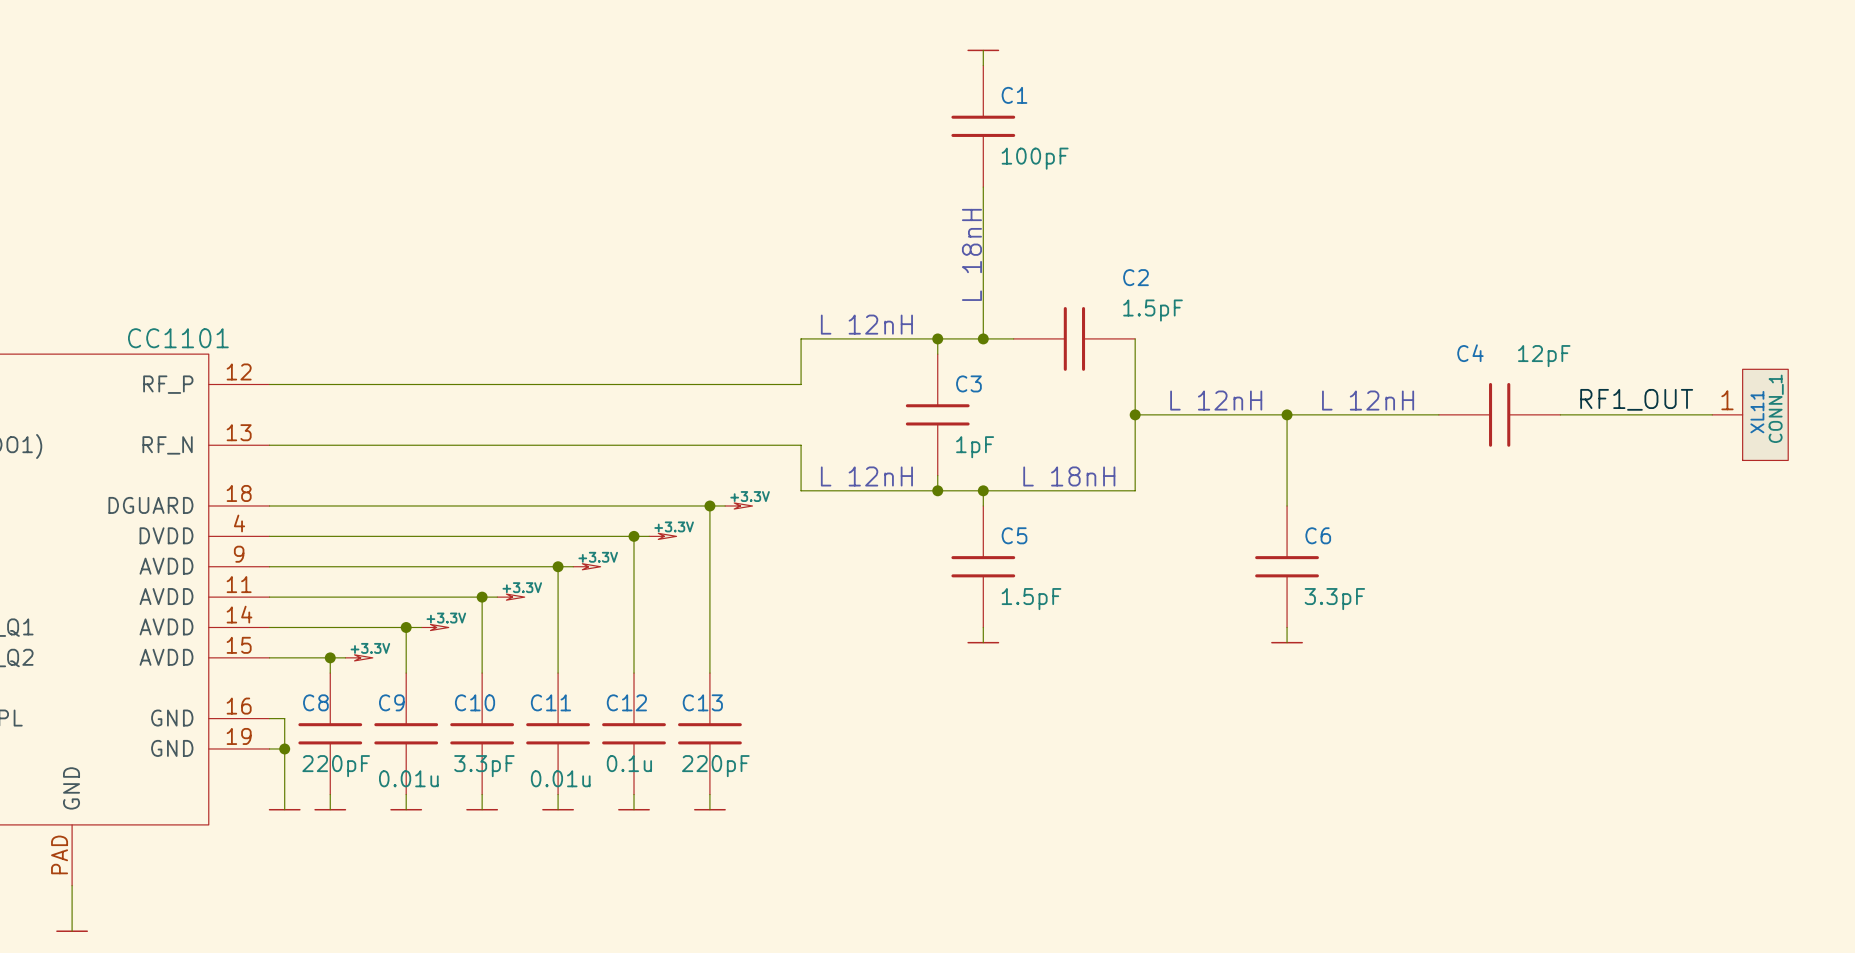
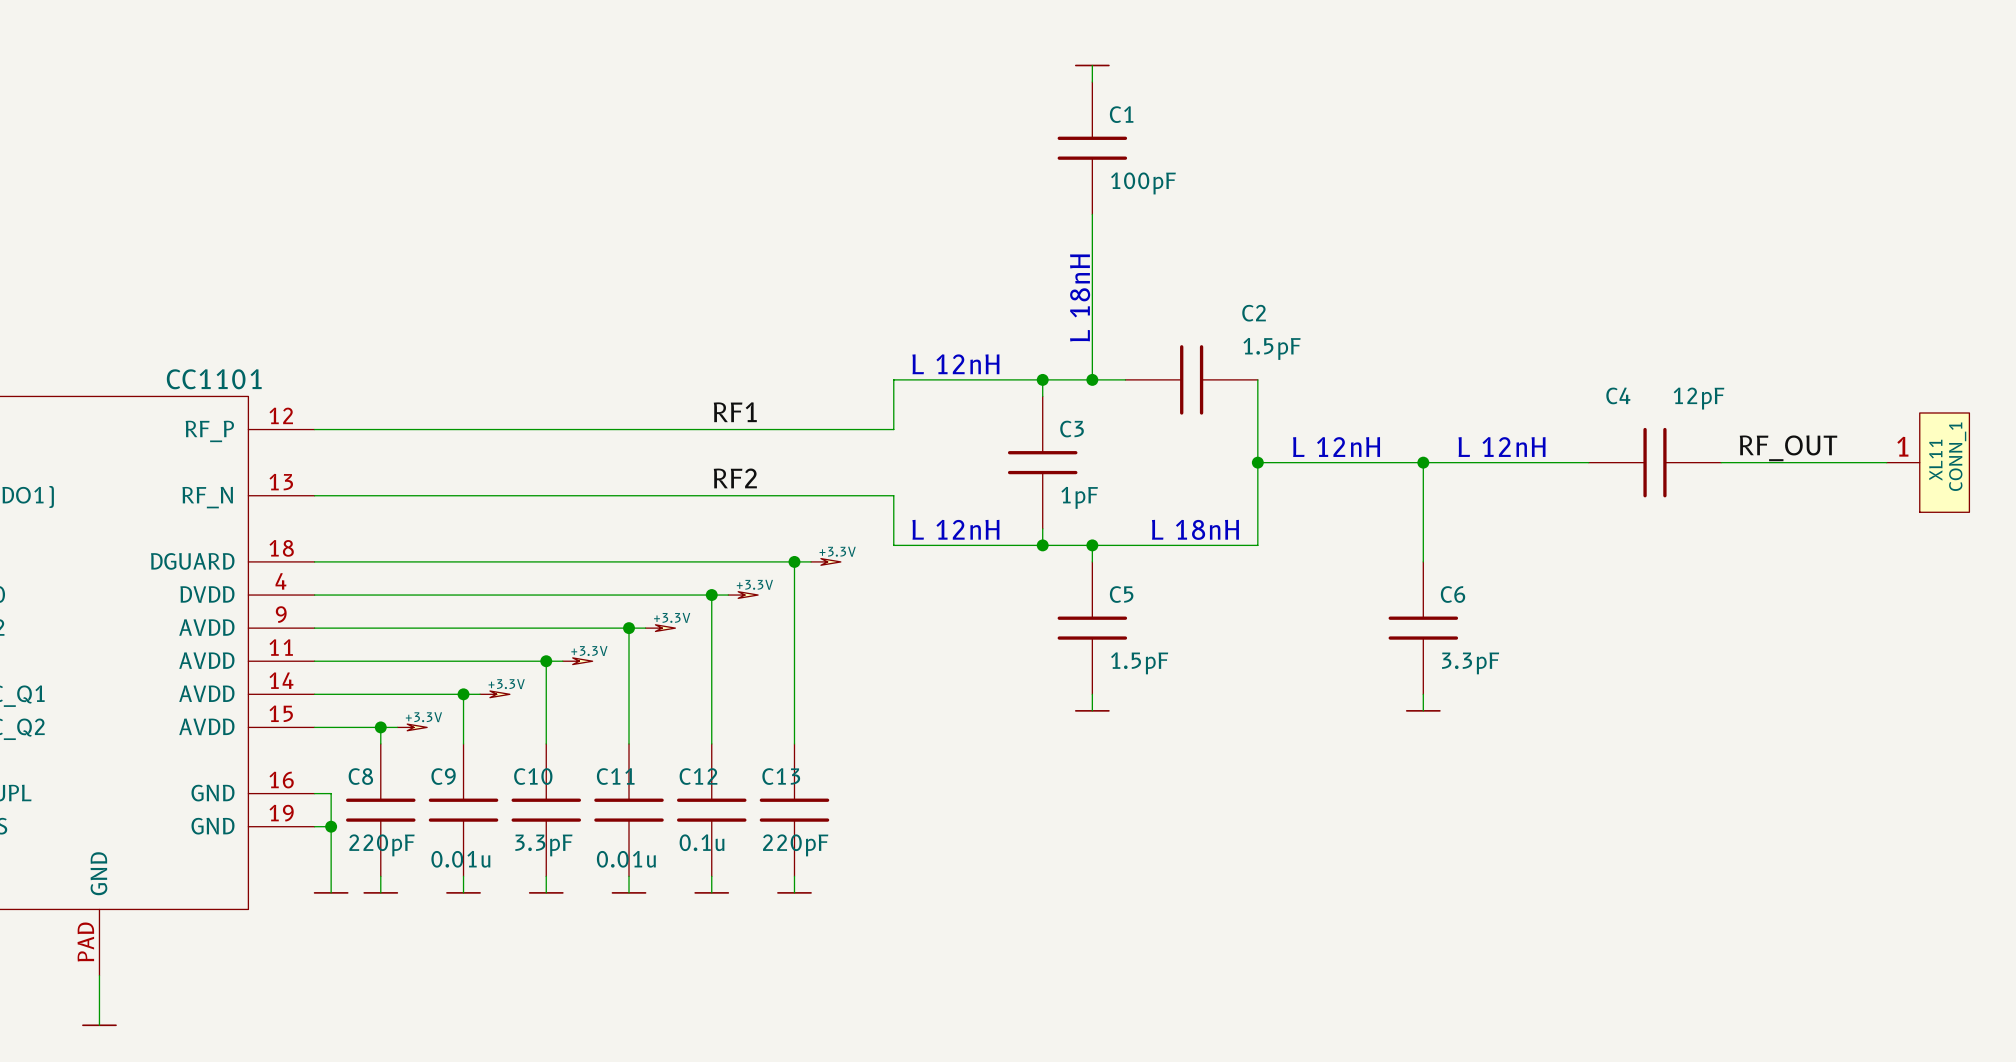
label: none -> RF1 (735, 412)
label: RF1_OUT (1636, 399) -> RF_OUT (1788, 448)
label: none -> RF2 (735, 478)

